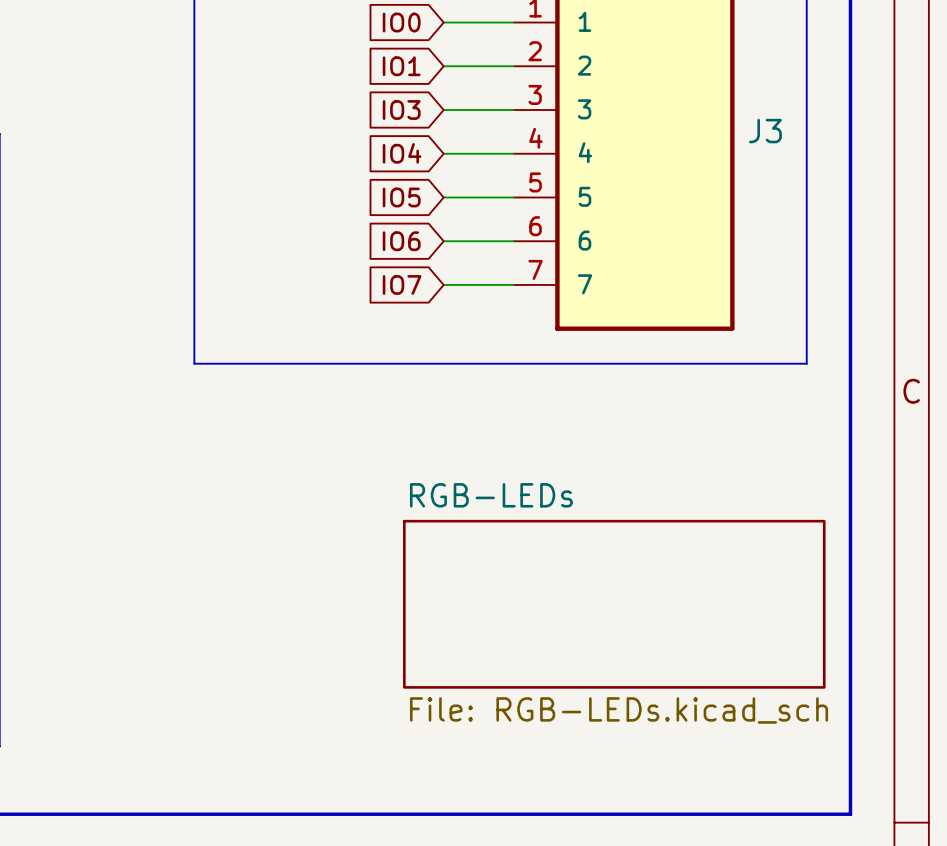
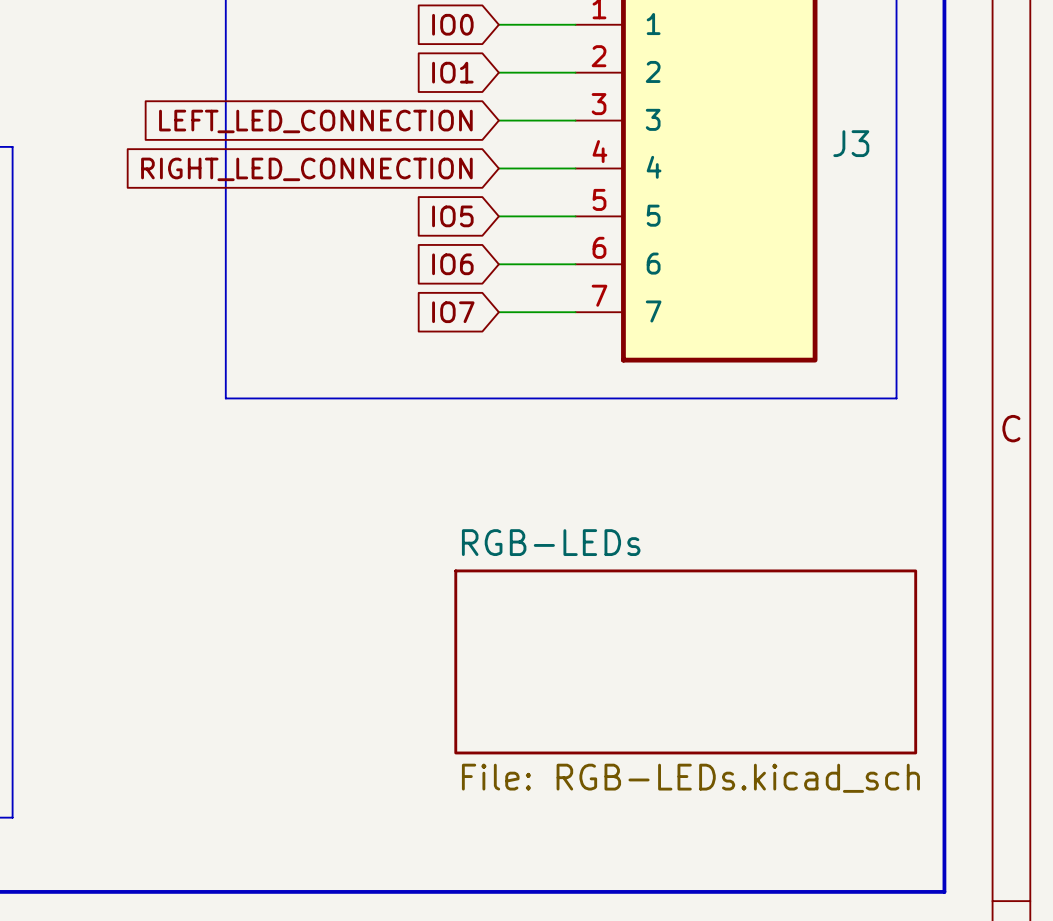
global label: IO3 (401, 110) -> LEFT_LED_CONNECTION (315, 121)
global label: IO4 (402, 153) -> RIGHT_LED_CONNECTION (306, 169)

